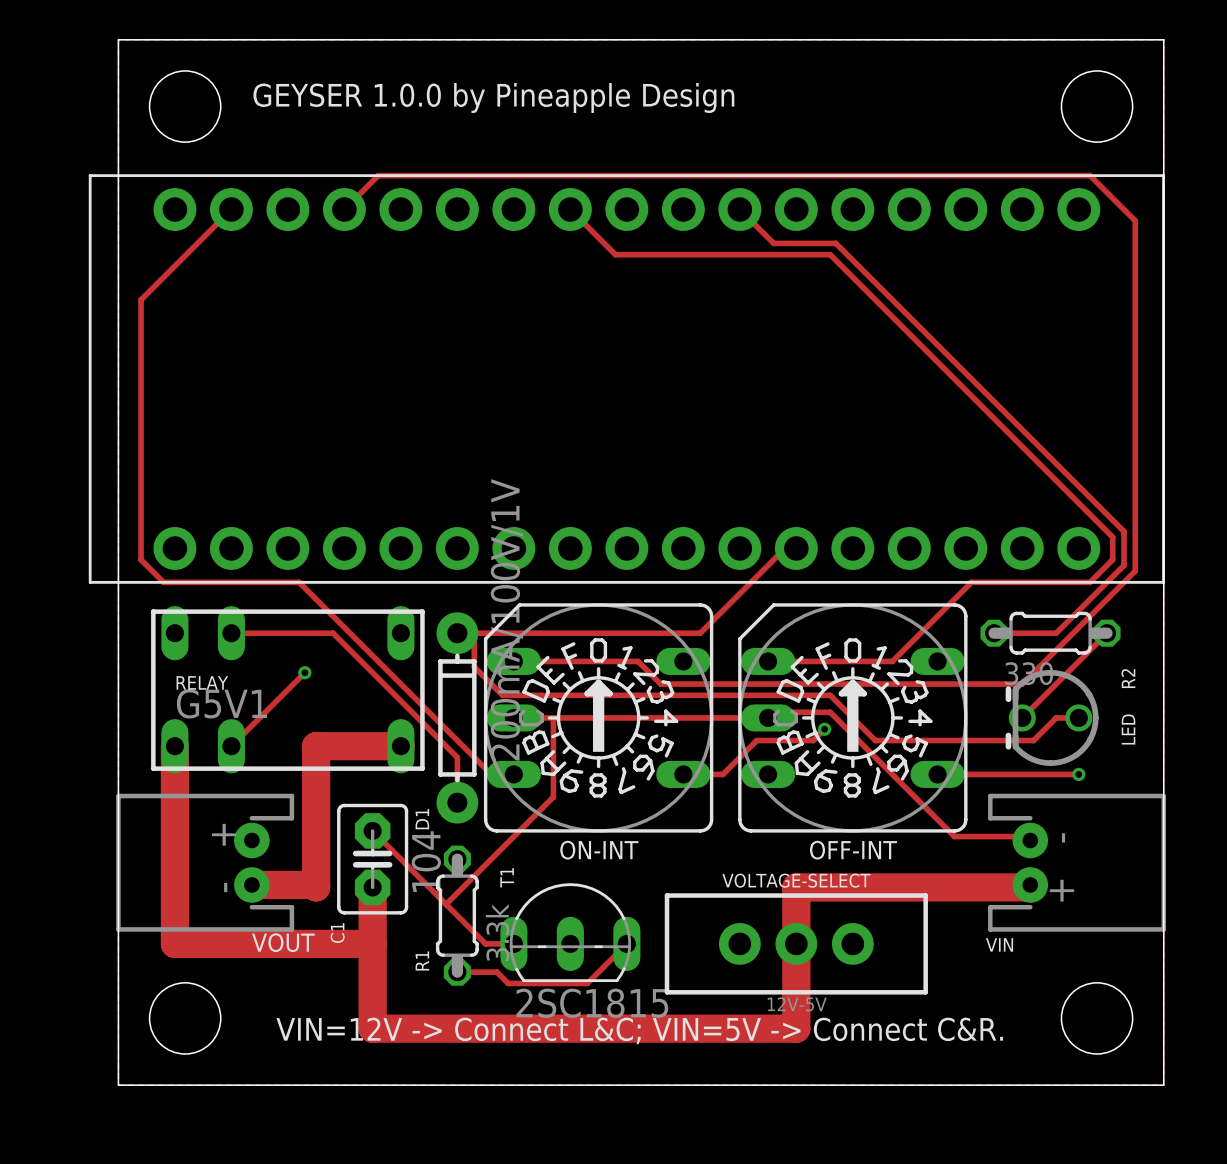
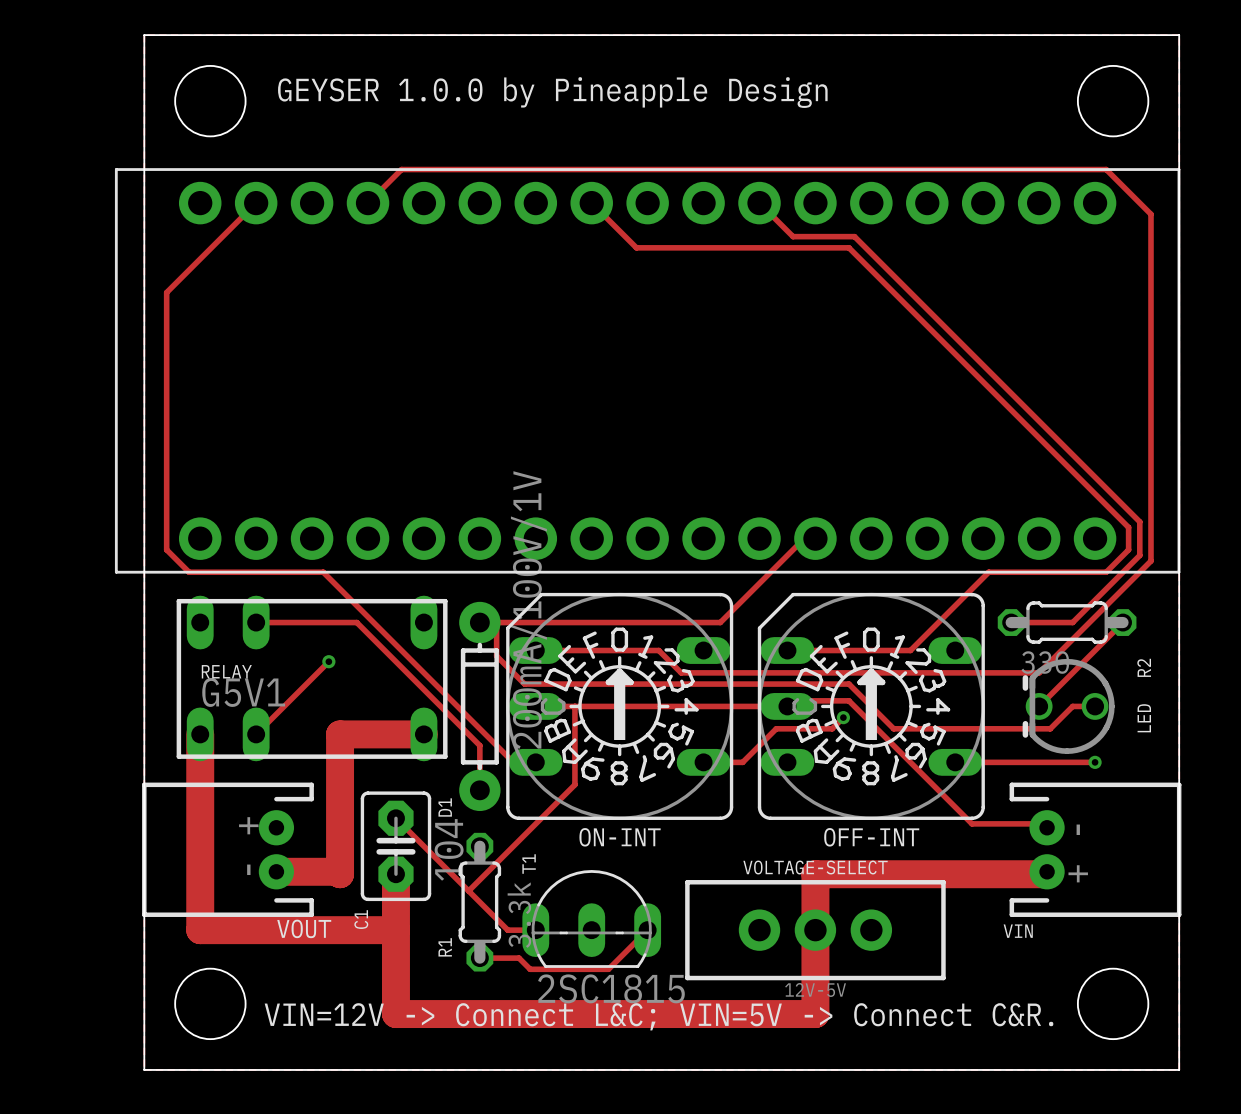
VOUT footprint: [116, 793, 295, 932] -> [142, 782, 314, 917]
VIN footprint: [988, 793, 1167, 932] -> [1009, 782, 1182, 917]

